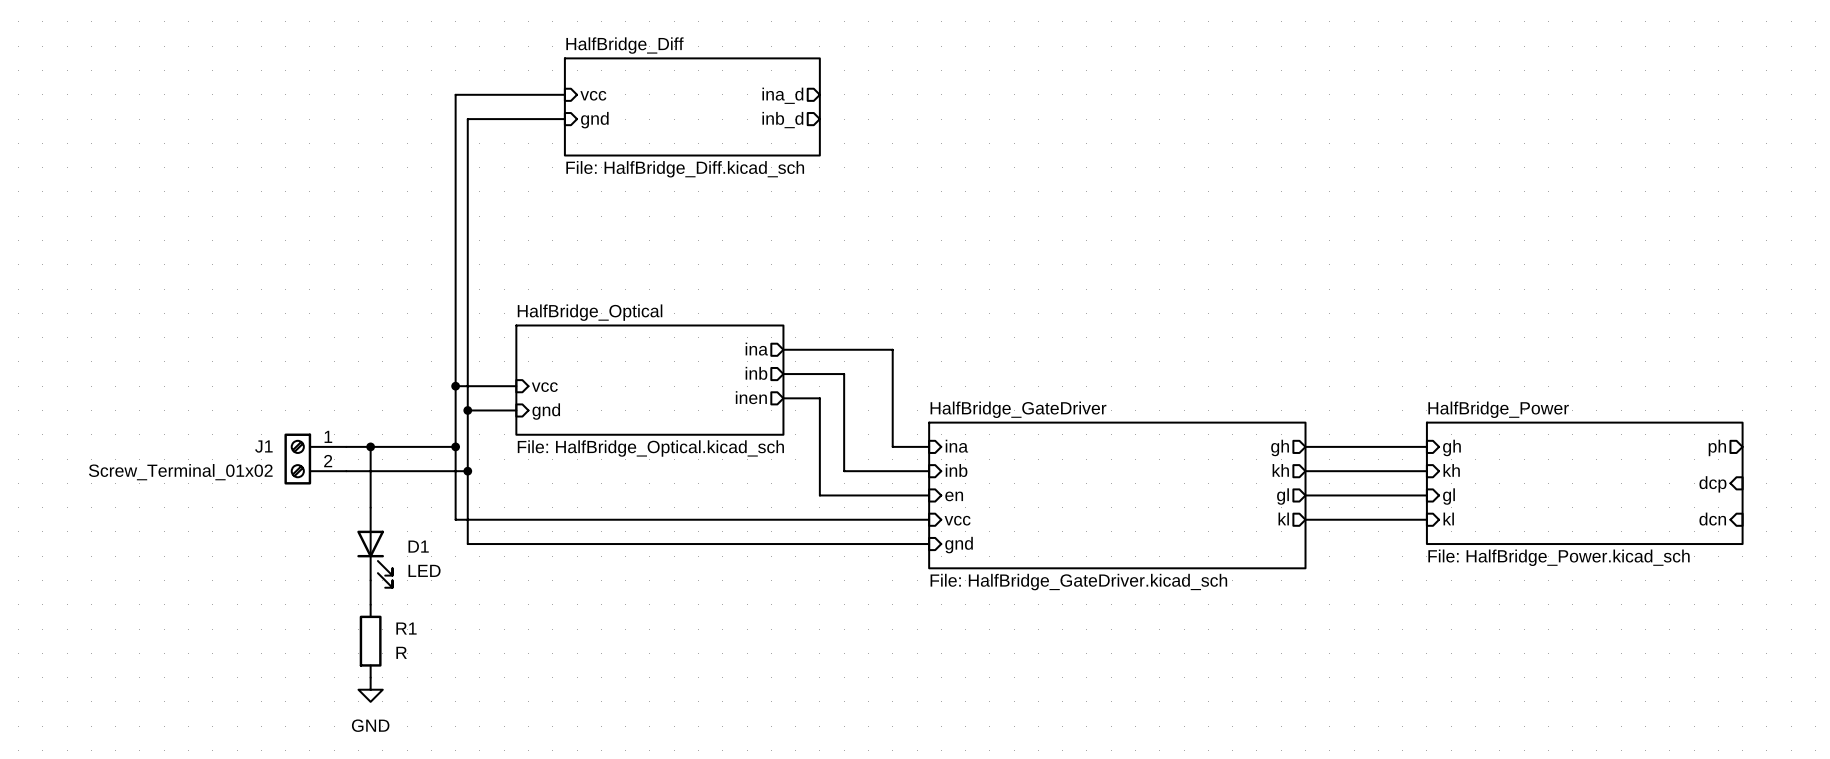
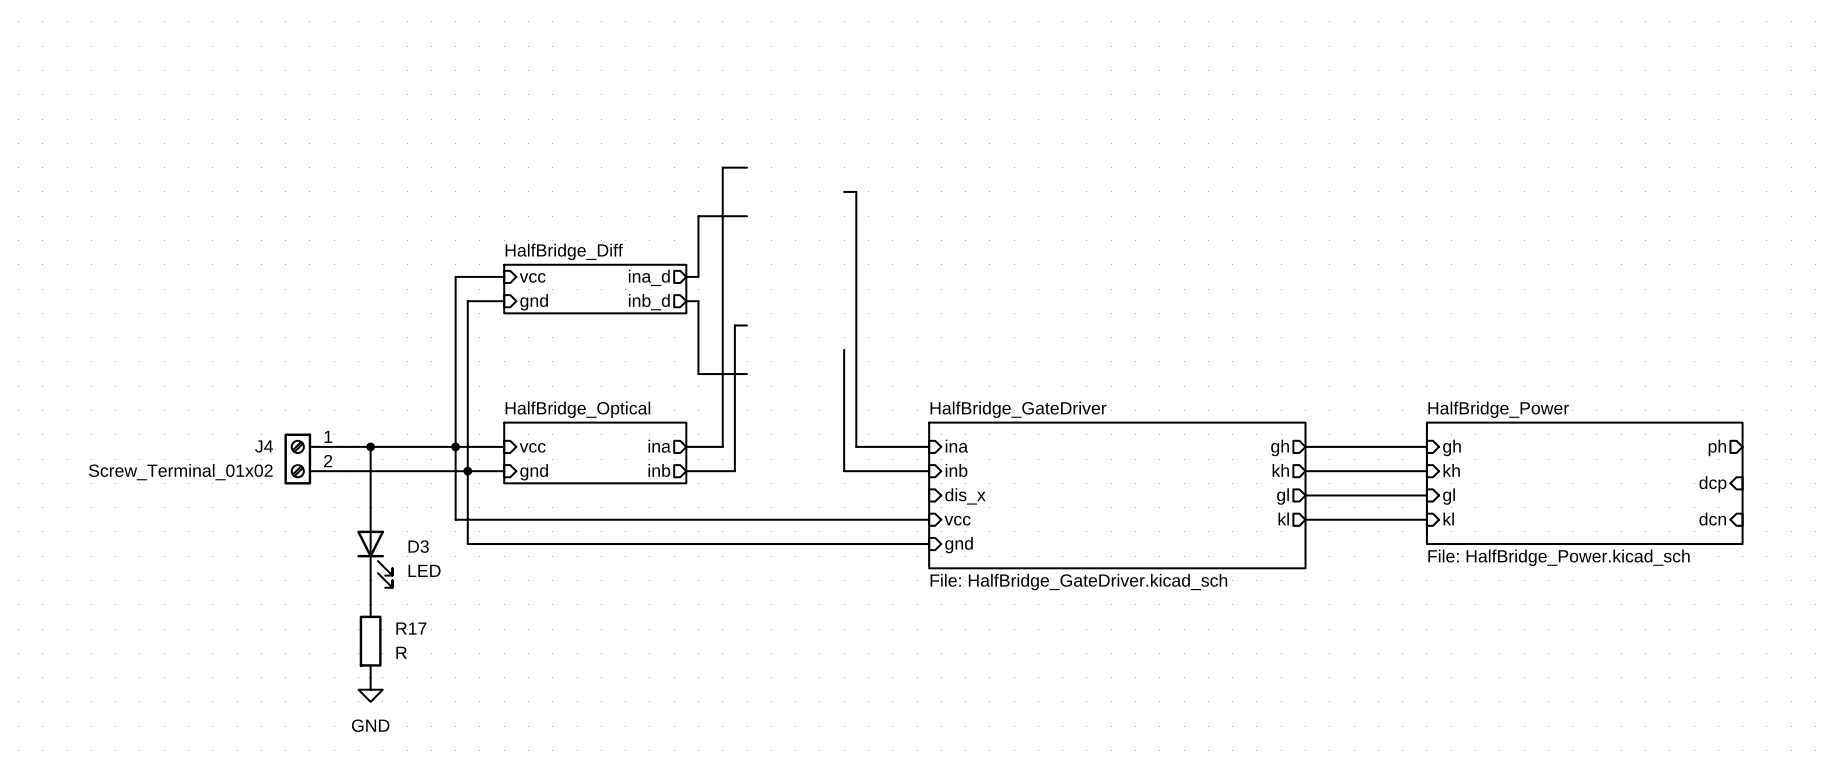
wire: (564, 94) (455, 94) (455, 276) -> (504, 276) (455, 276)
sheet pin: vcc (593, 95) -> none
sheet pin position: ina_d (782, 95) -> ina_d (649, 277)
sheet HalfBridge_Diff: File: HalfBridge_Diff.kicad_sch (692, 106) -> none
wire: (564, 119) (467, 119) (467, 301) -> (504, 301) (467, 301)
sheet pin: gnd (594, 120) -> none
sheet pin position: inb_d (782, 120) -> inb_d (649, 302)
wire: none -> (747, 167) (722, 167) (722, 446) (686, 446)
wire: none -> (747, 216) (698, 216) (698, 276) (686, 276)
sheet pin: none -> vcc (532, 277)
sheet HalfBridge_Diff: none -> (595, 289)
wire: none -> (686, 301) (698, 301) (698, 374) (747, 374)
sheet pin: none -> gnd (534, 302)
wire: none -> (747, 325) (734, 325) (734, 471) (686, 471)
sheet pin position: ina (756, 349) -> ina (659, 446)
wire: (783, 349) (892, 349) (892, 446) -> (844, 191) (856, 191) (856, 446) (892, 446)
sheet pin position: inb (756, 373) -> inb (659, 470)
wire: (783, 374) (844, 374) -> (844, 349) (844, 374)
sheet HalfBridge_Optical: File: HalfBridge_Optical.kicad_sch (649, 380) -> none
wire: (455, 386) (516, 386) -> none
junction: (455, 386) -> none
sheet pin: vcc (544, 387) -> none
sheet pin: inen (751, 397) -> none
wire: (783, 398) (819, 398) (819, 495) (929, 495) -> none
wire: (467, 410) (516, 410) -> (455, 446) (504, 446)
junction: (467, 410) -> none
sheet pin: gnd (546, 411) -> none
J1 name: J1 (263, 446) -> J4 (264, 446)
sheet pin: none -> vcc (532, 447)
sheet HalfBridge_Optical: none -> (595, 452)
wire: none -> (467, 471) (504, 471)
sheet pin: none -> gnd (534, 472)
sheet pin: en (954, 496) -> dis_x (965, 496)
D1 name: D1 (418, 546) -> D3 (418, 546)
R1 name: R1 (406, 628) -> R17 (411, 628)

